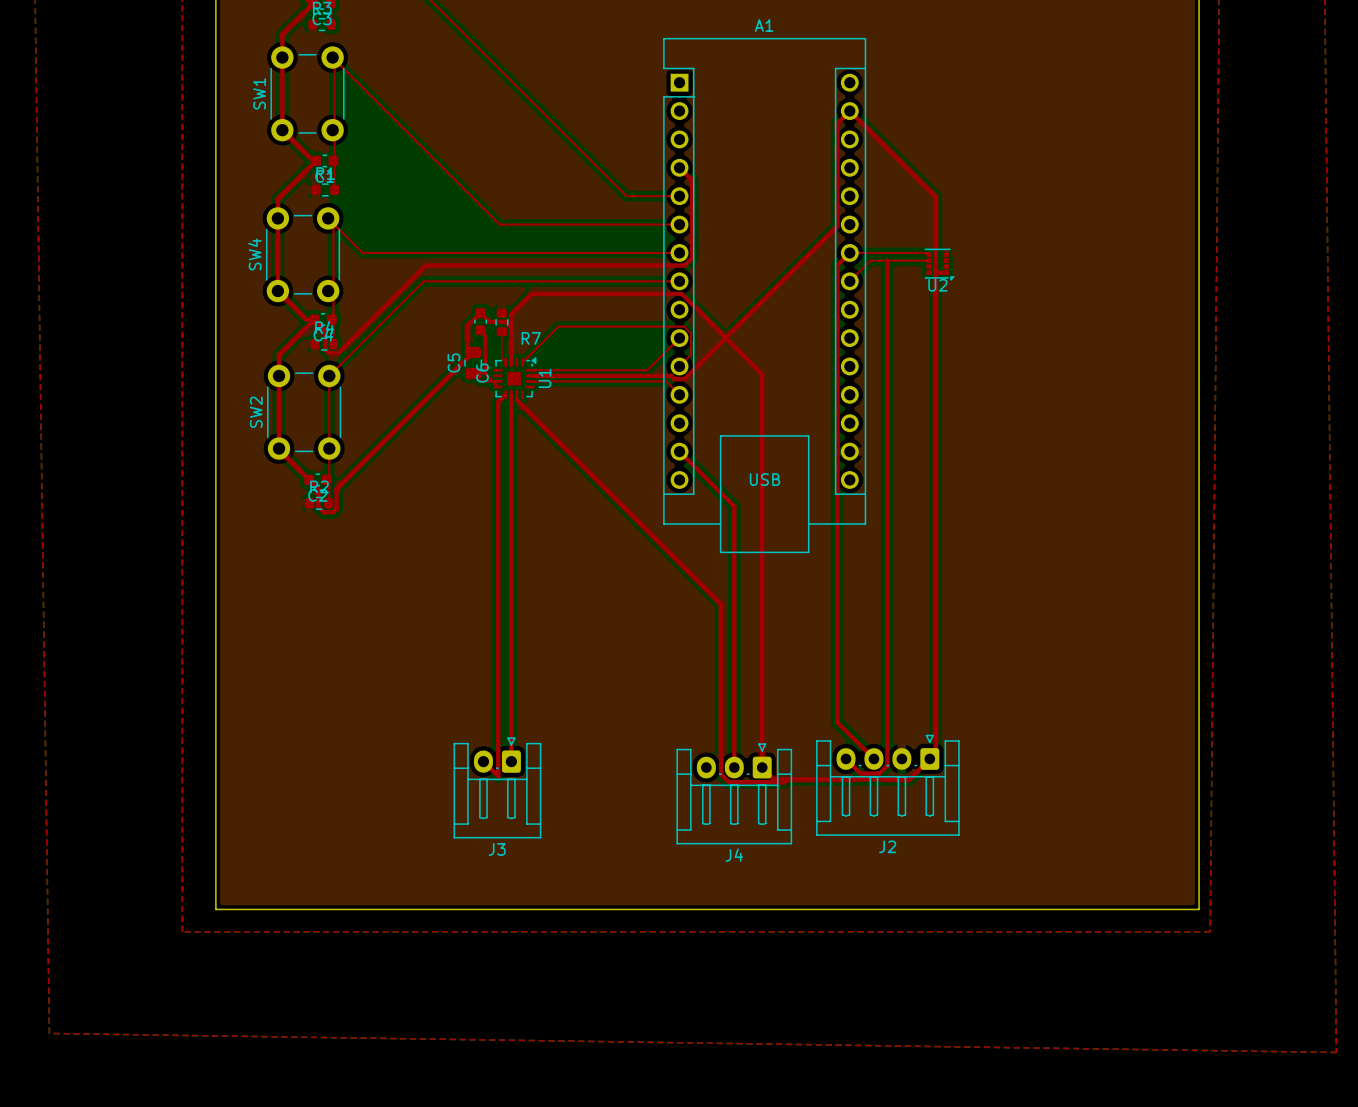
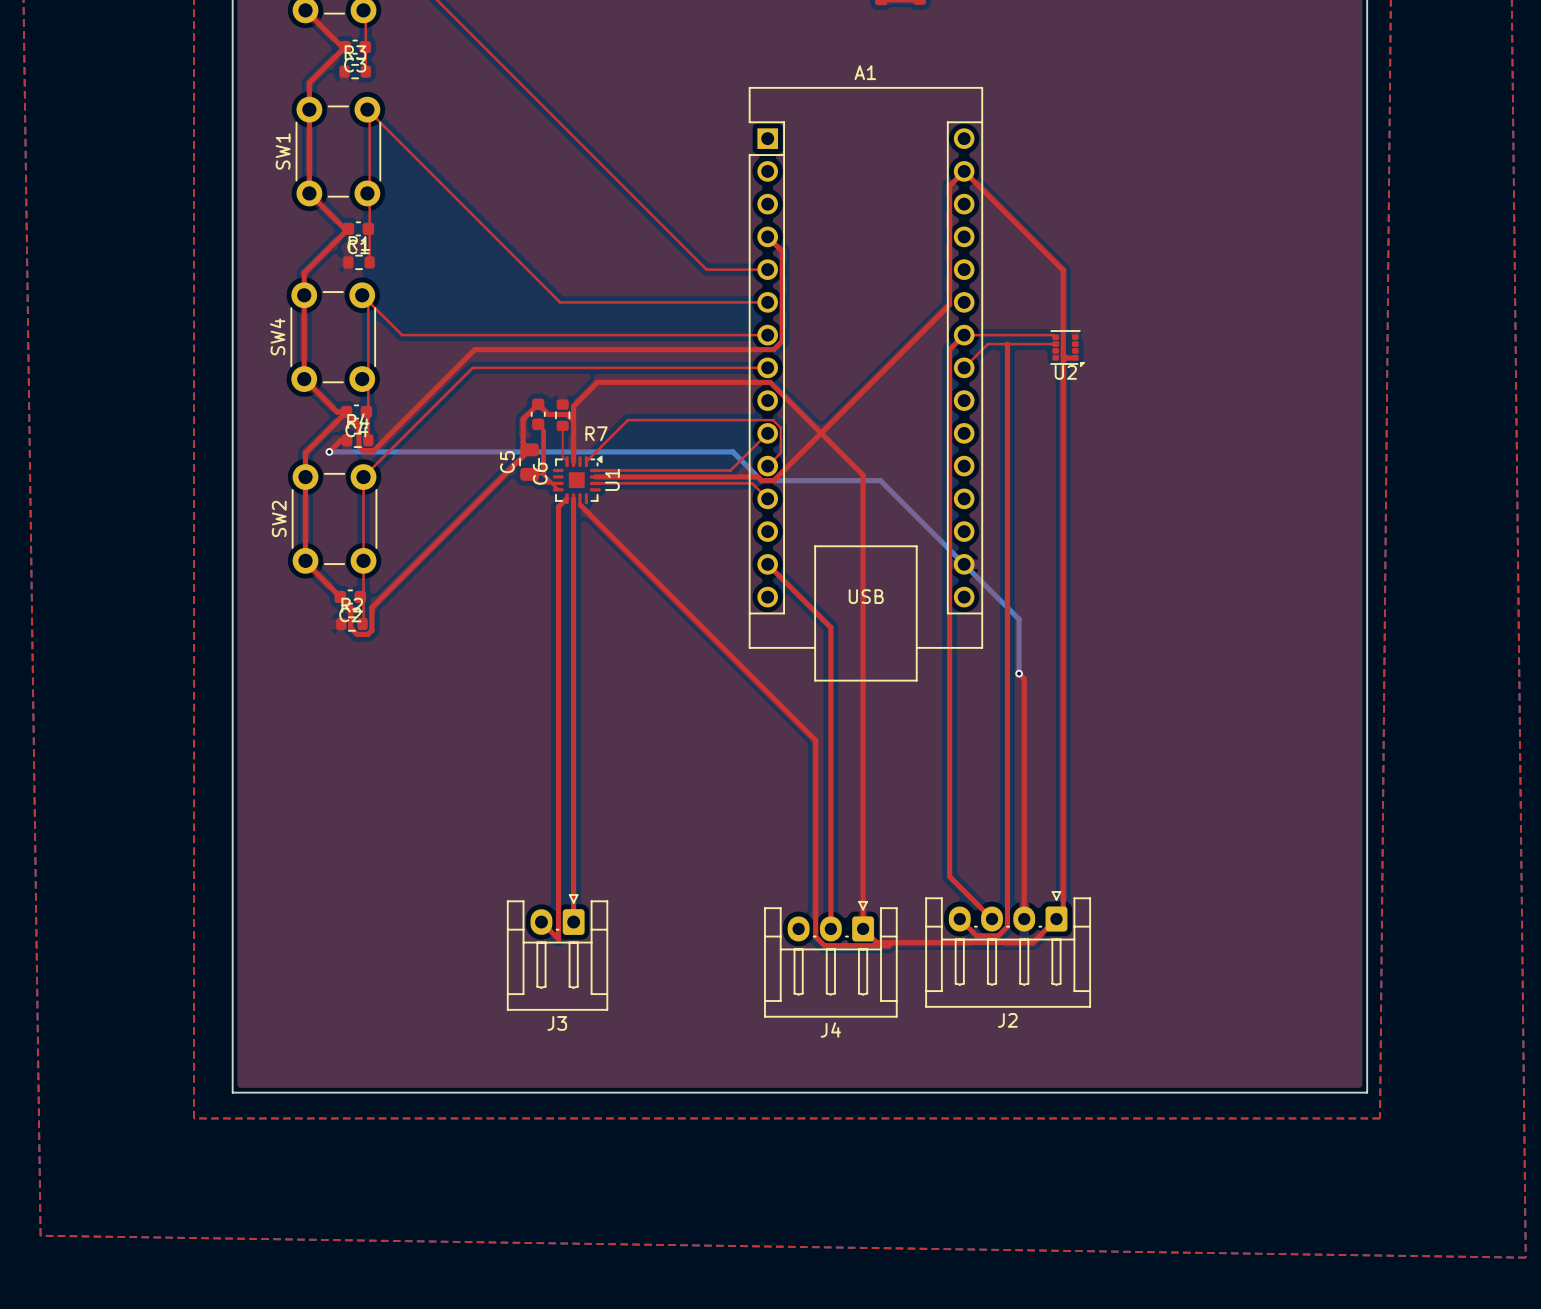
top track: none -> (347, 440) (340, 440) (329, 451)
bottom track: none -> (329, 451) (732, 451) (761, 480) (880, 480) (1019, 619) (1019, 673)
via: none -> (329, 451)
top track: none -> (1019, 673) (1024, 678) (1024, 919)
via: none -> (1019, 673)

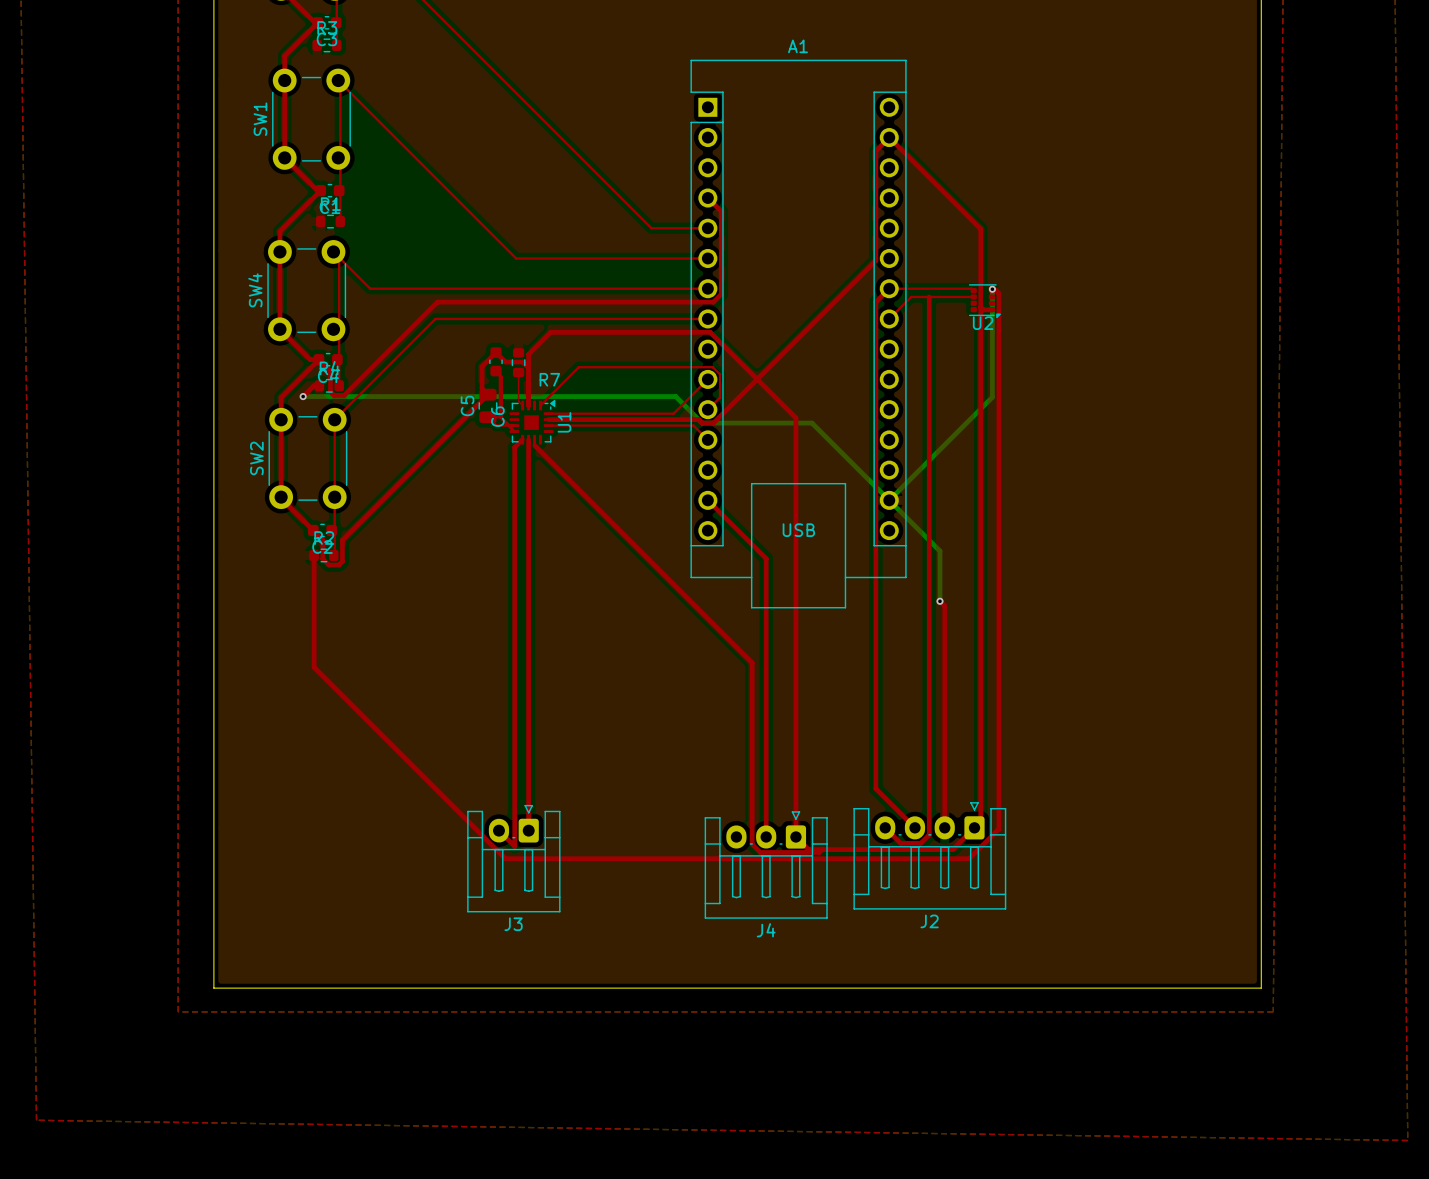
bottom track: none -> (992, 289) (992, 397) (889, 500)
via: none -> (992, 289)
top track: none -> (991, 290) (995, 290) (998, 293) (998, 828) (969, 858) (505, 858) (314, 667) (314, 555)

